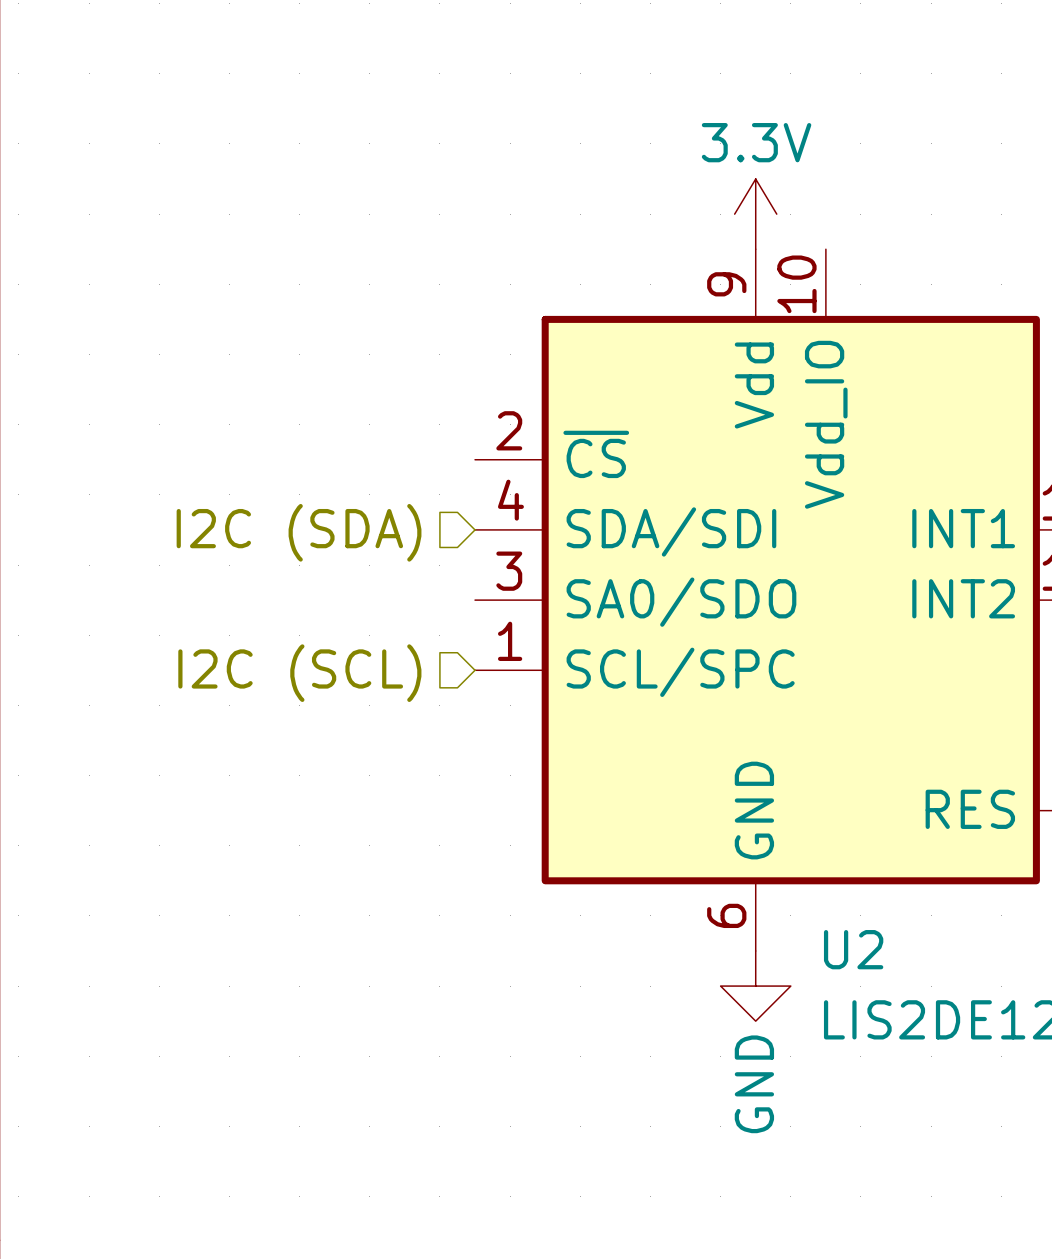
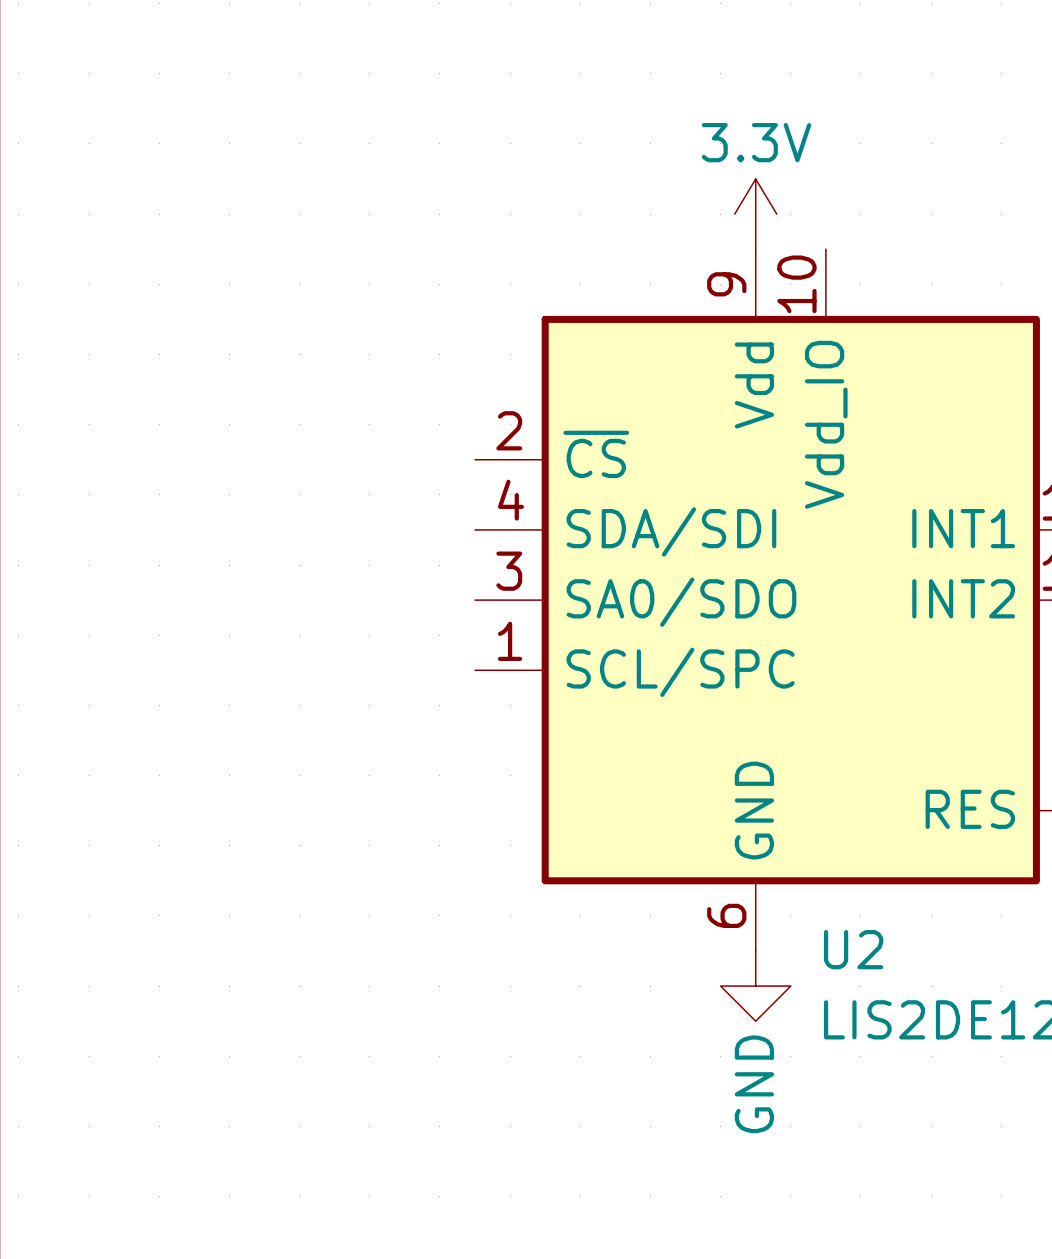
hierarchical label: I2C (SDA) (299, 532) -> none
hierarchical label: I2C (SCL) (299, 673) -> none

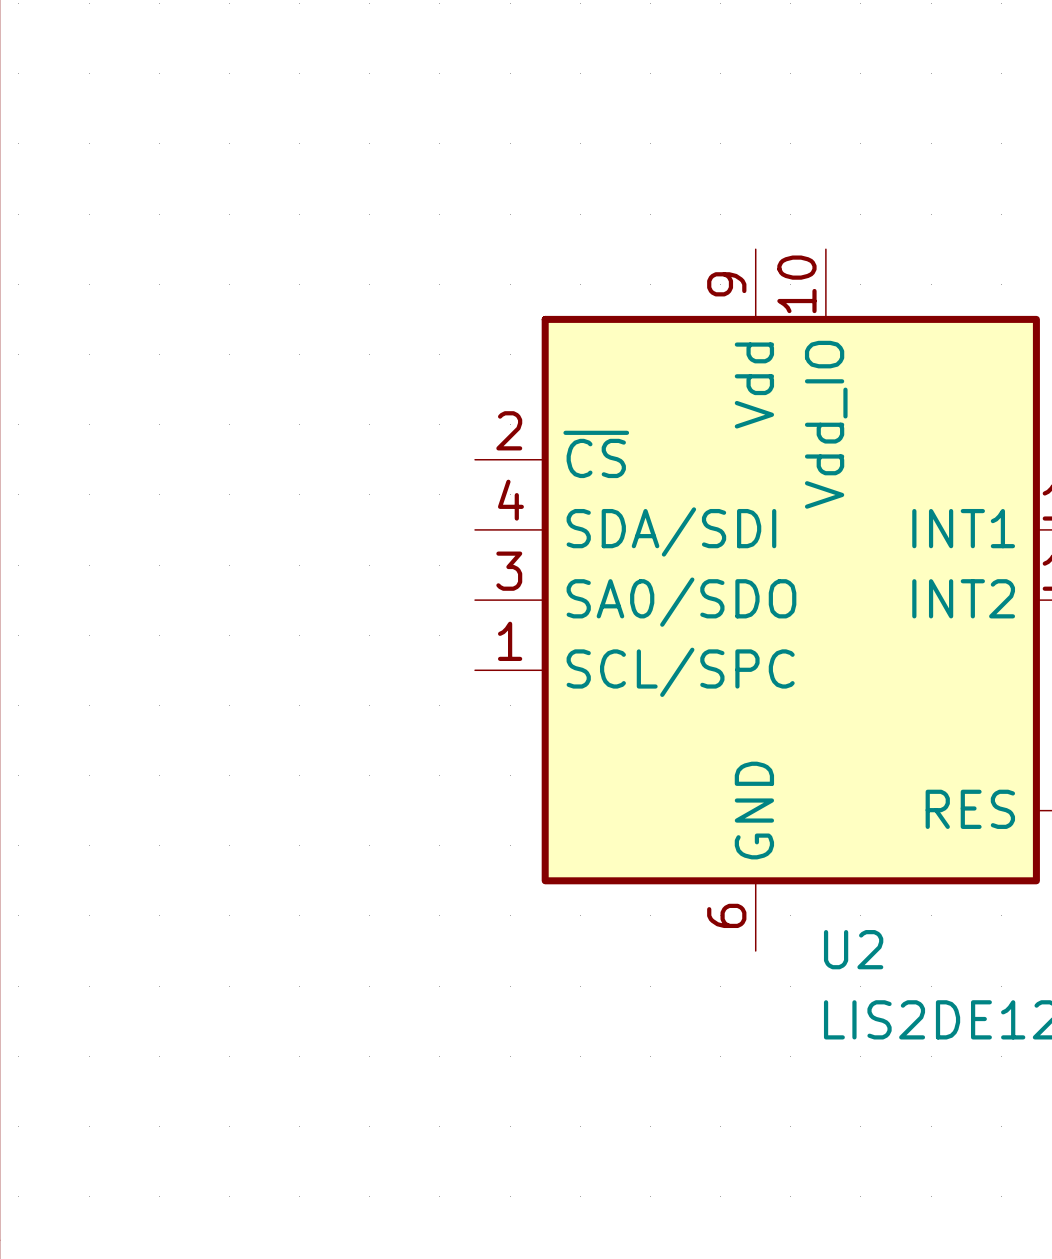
power symbol: 3.3V (755, 214) -> none
power symbol: GND (755, 986) -> none

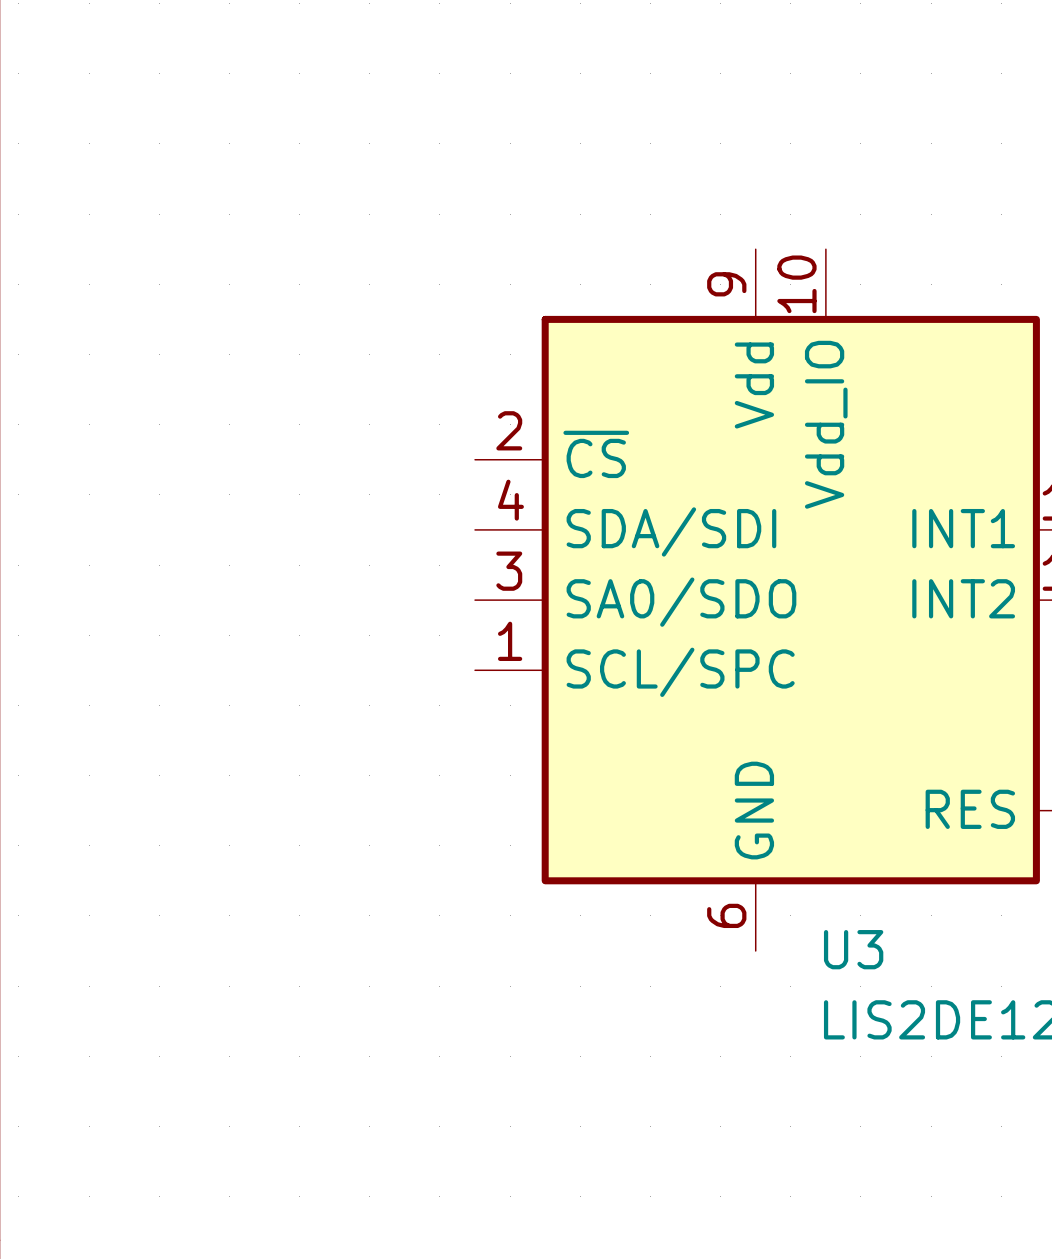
U2 name: U2 (853, 949) -> U3 (853, 949)

